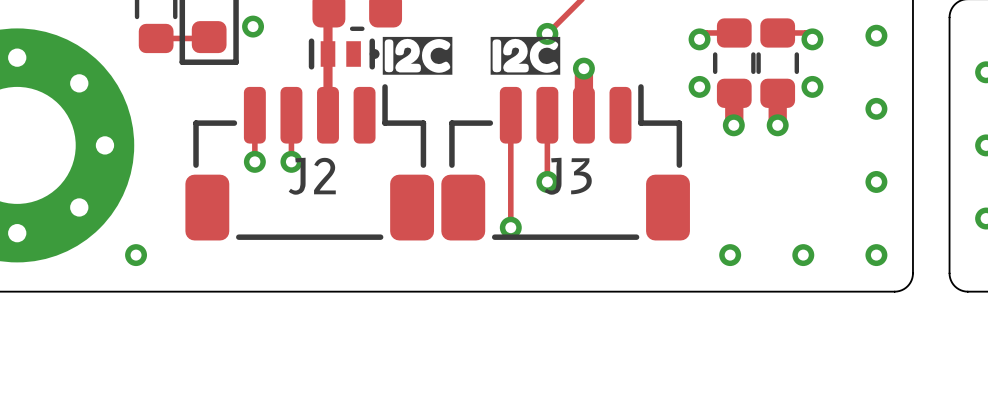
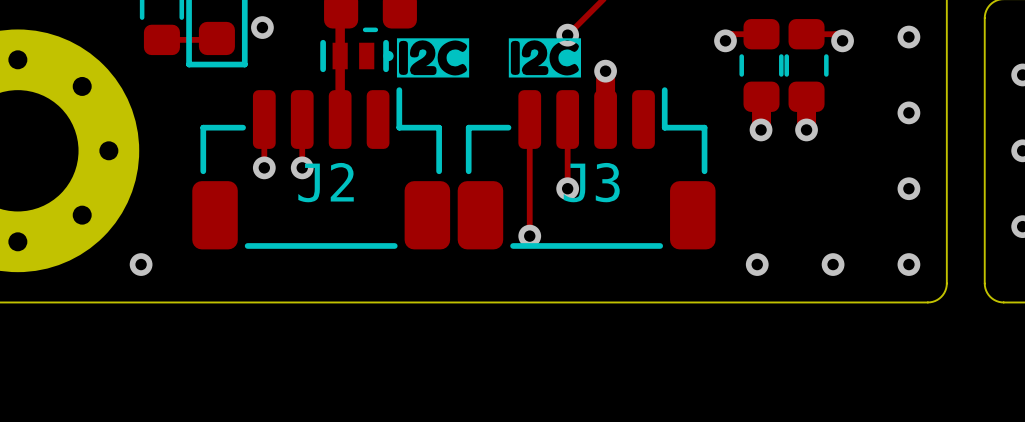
via: (699, 86) -> none
via: (812, 86) -> none

